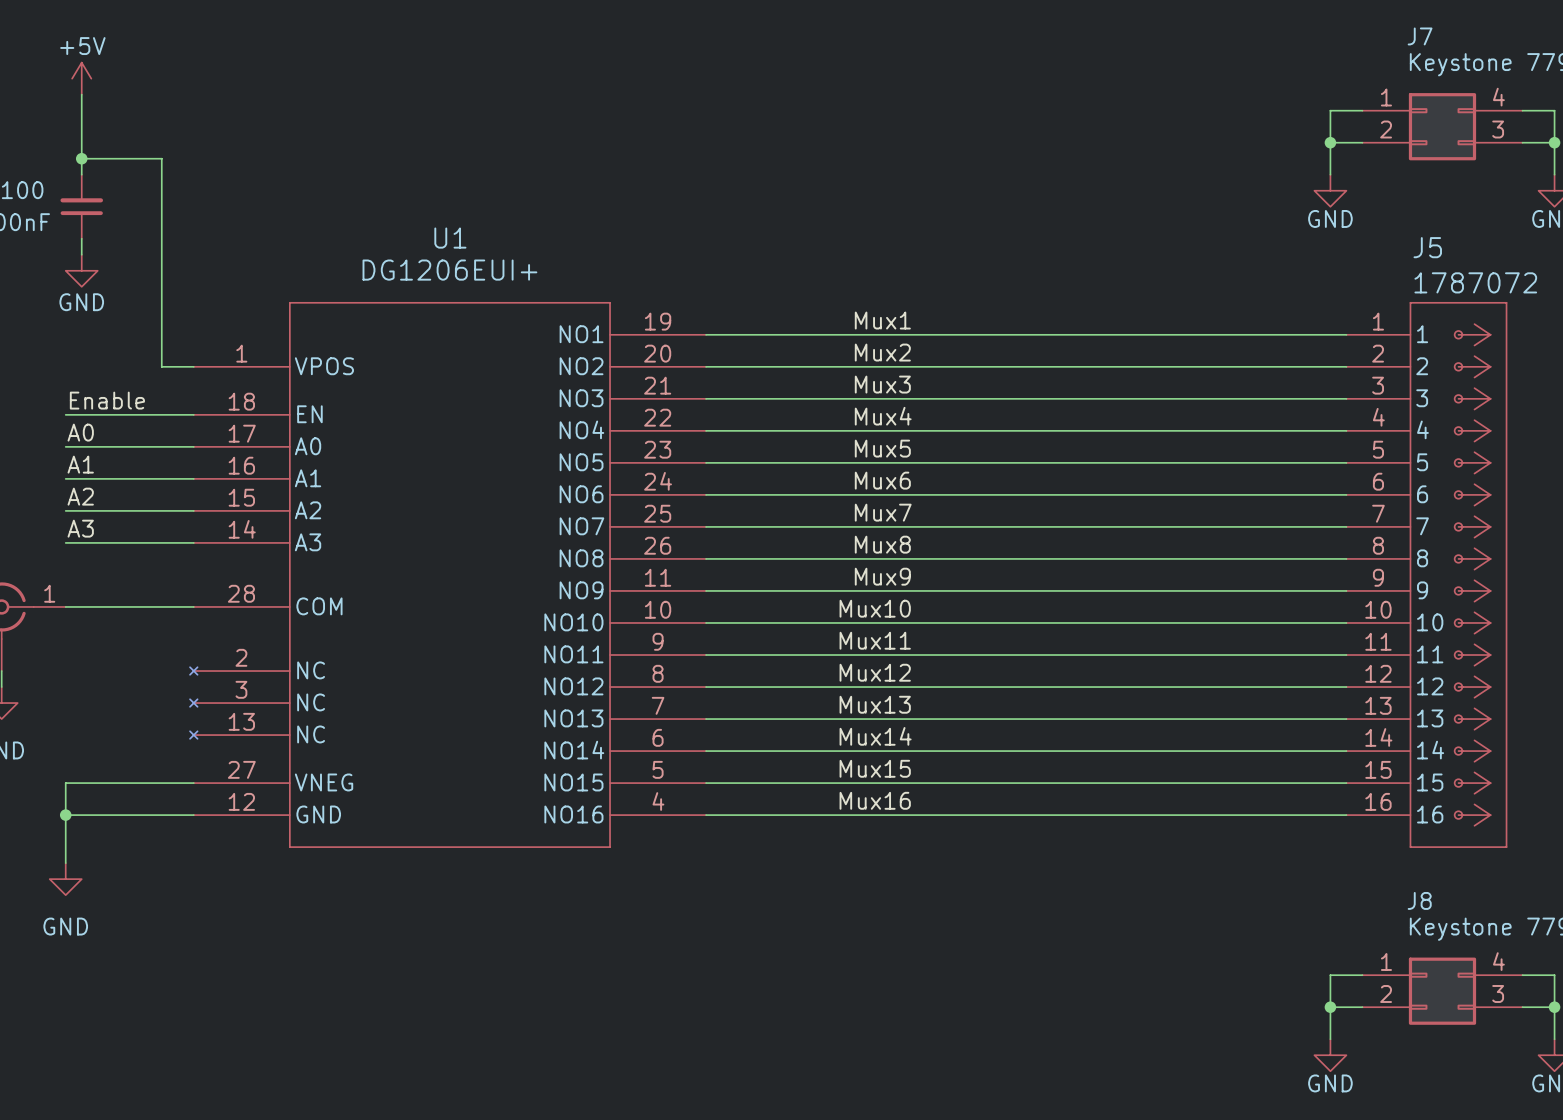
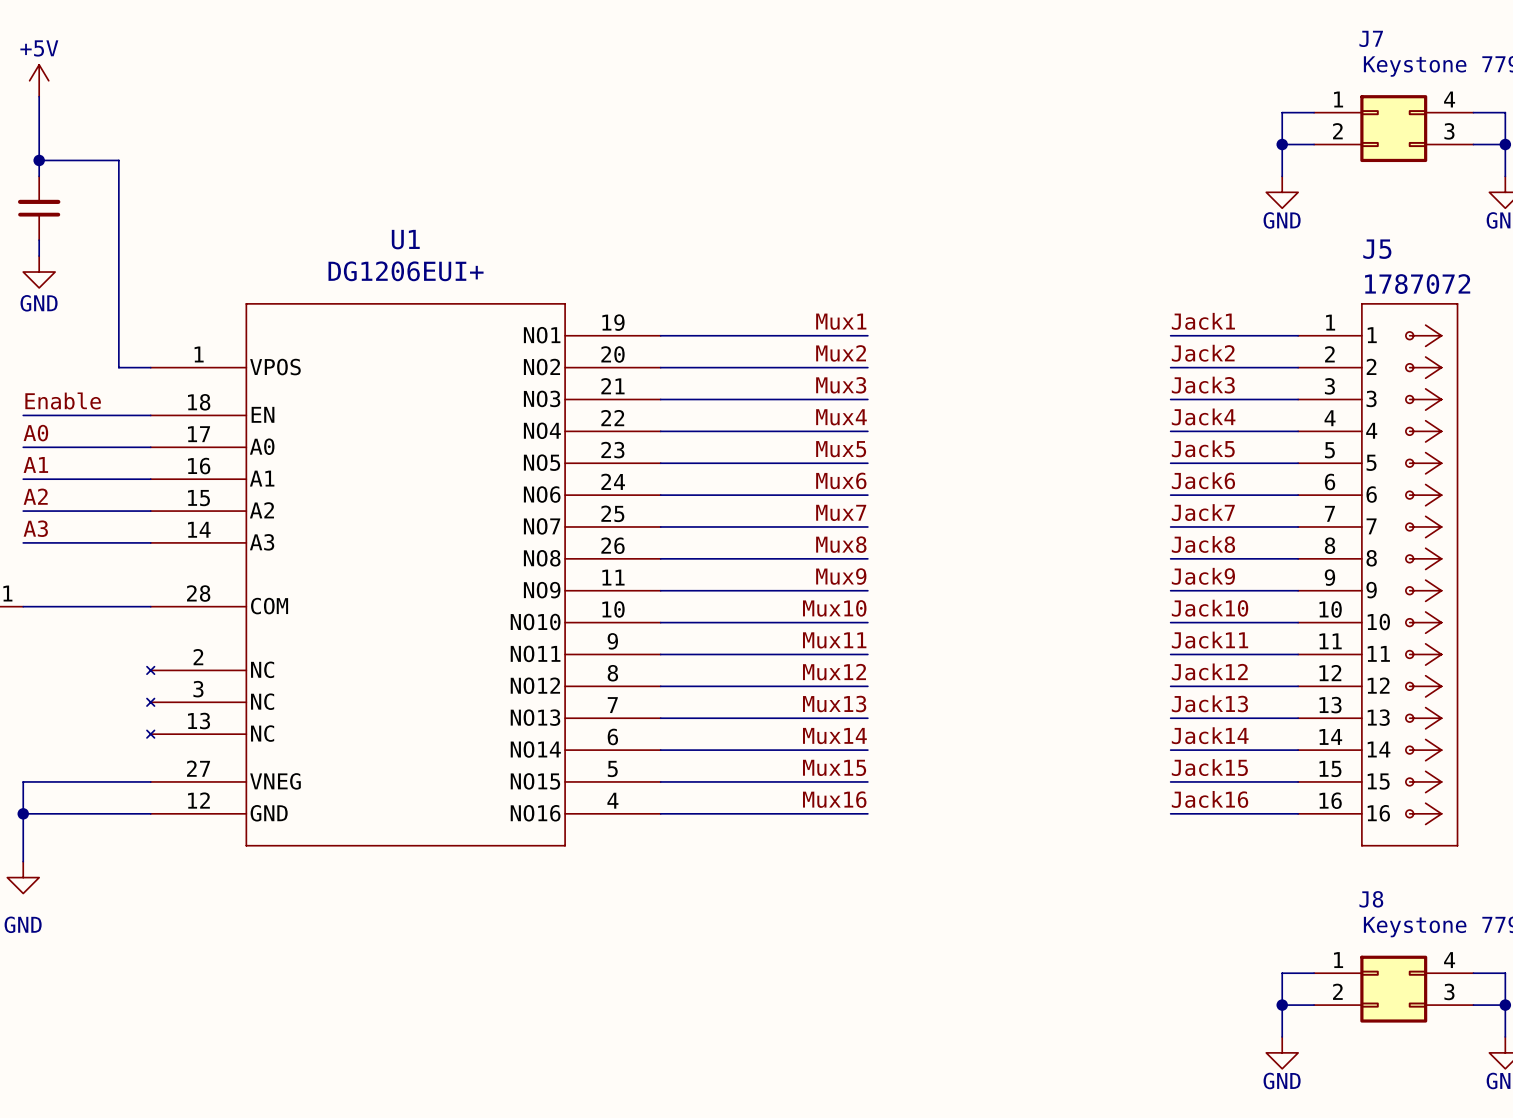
label: none -> Jack1 (1203, 321)
wire: (914, 334) (1218, 334) -> none
label: none -> Jack2 (1203, 353)
wire: (914, 366) (1218, 366) -> none
label: none -> Jack3 (1203, 385)
wire: (914, 398) (1218, 398) -> none
label: none -> Jack4 (1203, 416)
wire: (914, 430) (1218, 430) -> none
label: none -> Jack5 (1203, 448)
wire: (914, 462) (1218, 462) -> none
label: none -> Jack6 (1203, 480)
wire: (914, 494) (1218, 494) -> none
label: none -> Jack7 (1203, 512)
wire: (914, 526) (1218, 526) -> none
label: none -> Jack8 (1203, 544)
wire: (914, 558) (1218, 558) -> none
label: none -> Jack9 (1203, 576)
wire: (914, 590) (1218, 590) -> none
label: none -> Jack10 (1210, 608)
wire: (914, 622) (1218, 622) -> none
label: none -> Jack11 (1209, 640)
wire: (914, 655) (1218, 655) -> none
label: none -> Jack12 (1209, 671)
wire: (914, 687) (1218, 687) -> none
label: none -> Jack13 (1209, 703)
wire: (914, 719) (1218, 719) -> none
label: none -> Jack14 (1210, 735)
wire: (914, 751) (1218, 751) -> none
label: none -> Jack15 (1209, 767)
wire: (914, 783) (1218, 783) -> none
label: none -> Jack16 (1210, 799)
wire: (914, 815) (1218, 815) -> none

